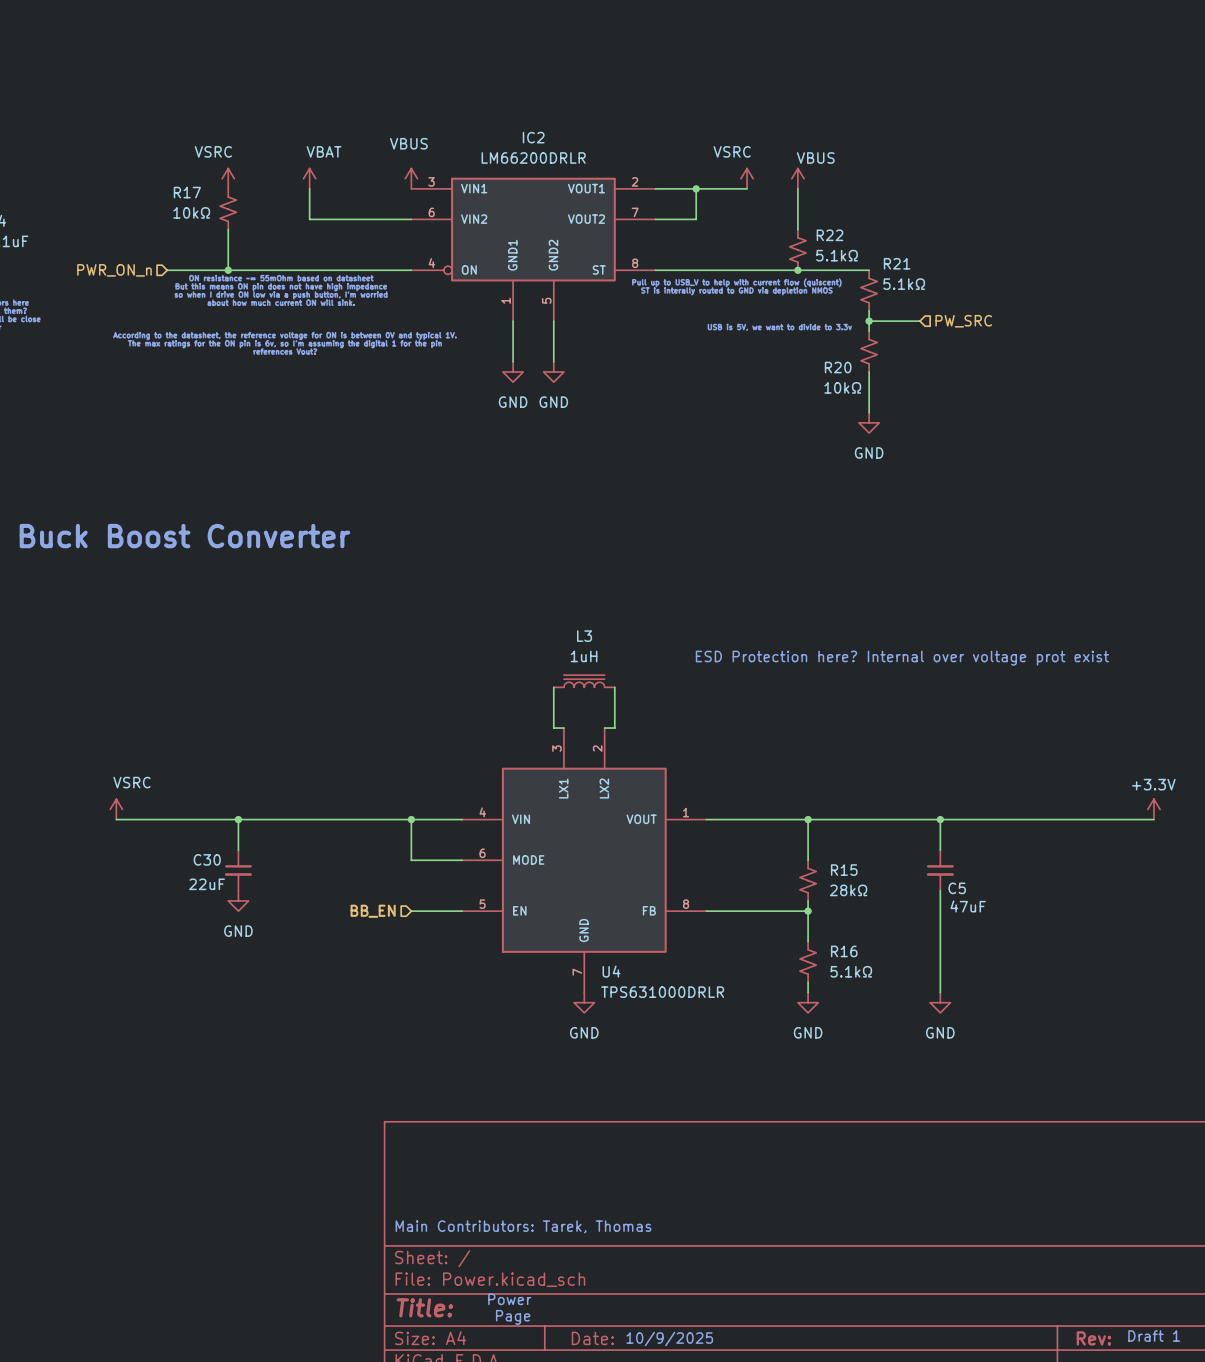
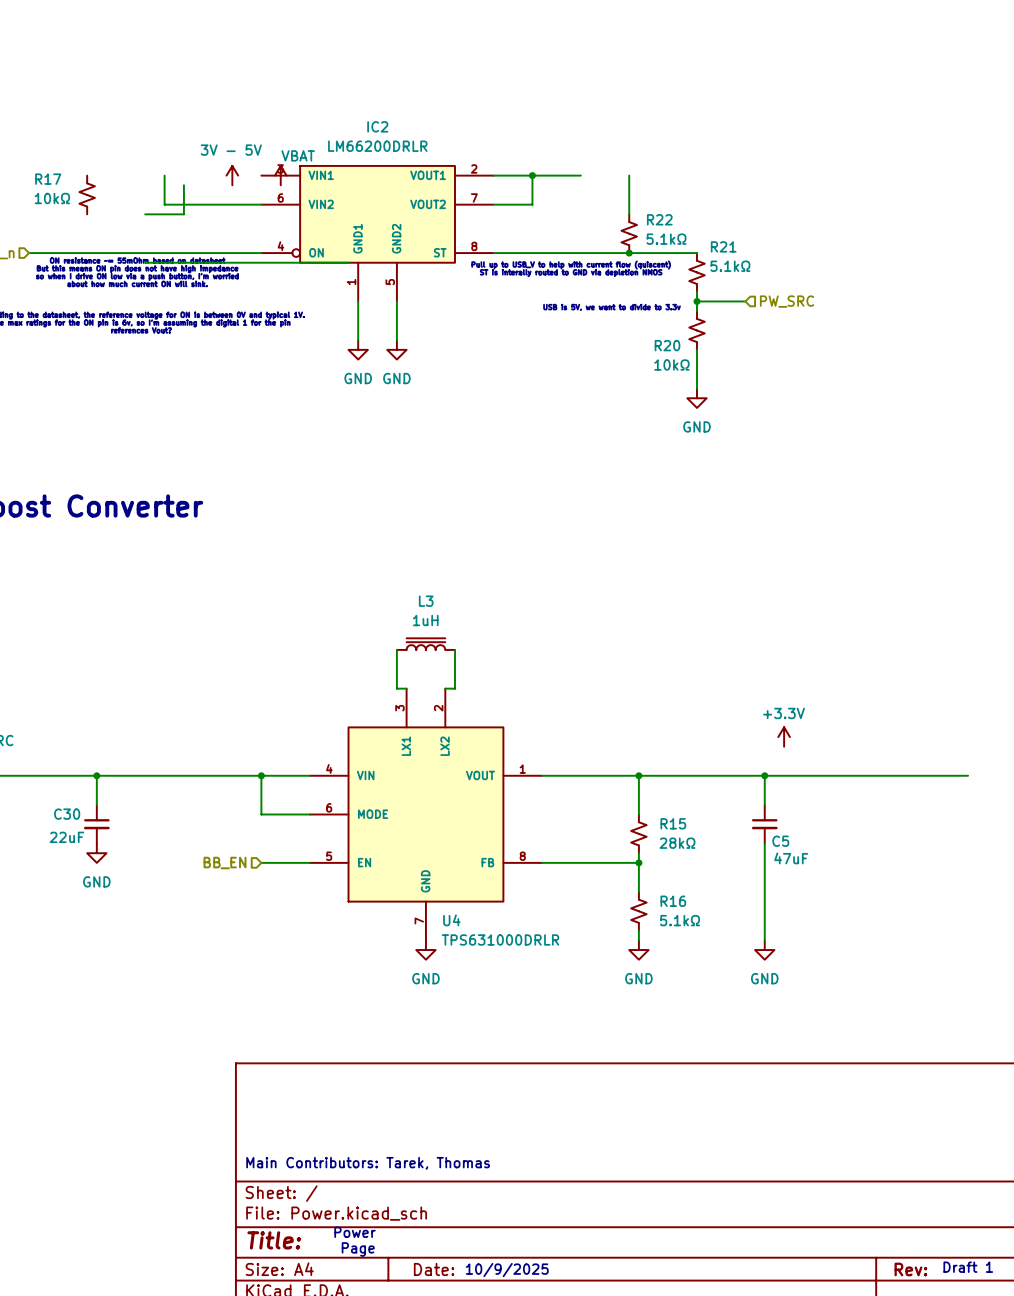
power symbol text position: VBAT (324, 151) -> VBAT (298, 155)
power symbol: VSRC (228, 178) -> none
power symbol position: VBAT (309, 178) -> VBAT (280, 175)
power symbol: VBUS (411, 178) -> none
power symbol: VSRC (747, 178) -> none
power symbol: VBUS (797, 178) -> none
power symbol: none -> 3V - 5V (232, 175)
wire: none -> (183, 185) (183, 214) (145, 214)
wire: (228, 229) (228, 270) -> none
junction: (228, 270) -> none
wire: none -> (145, 262) (348, 262)
text: ESD Protection here? Internal over voltage prot exist (902, 658) -> none
power symbol position: +3.3V (1153, 809) -> +3.3V (784, 737)

